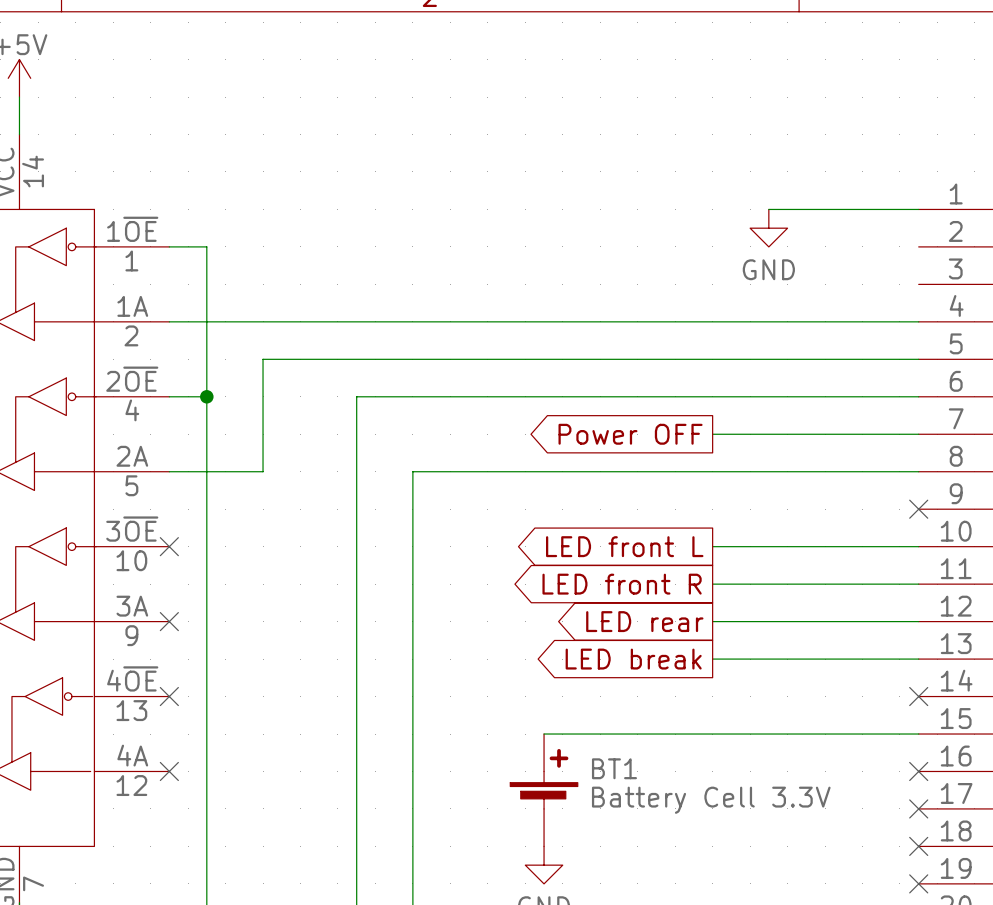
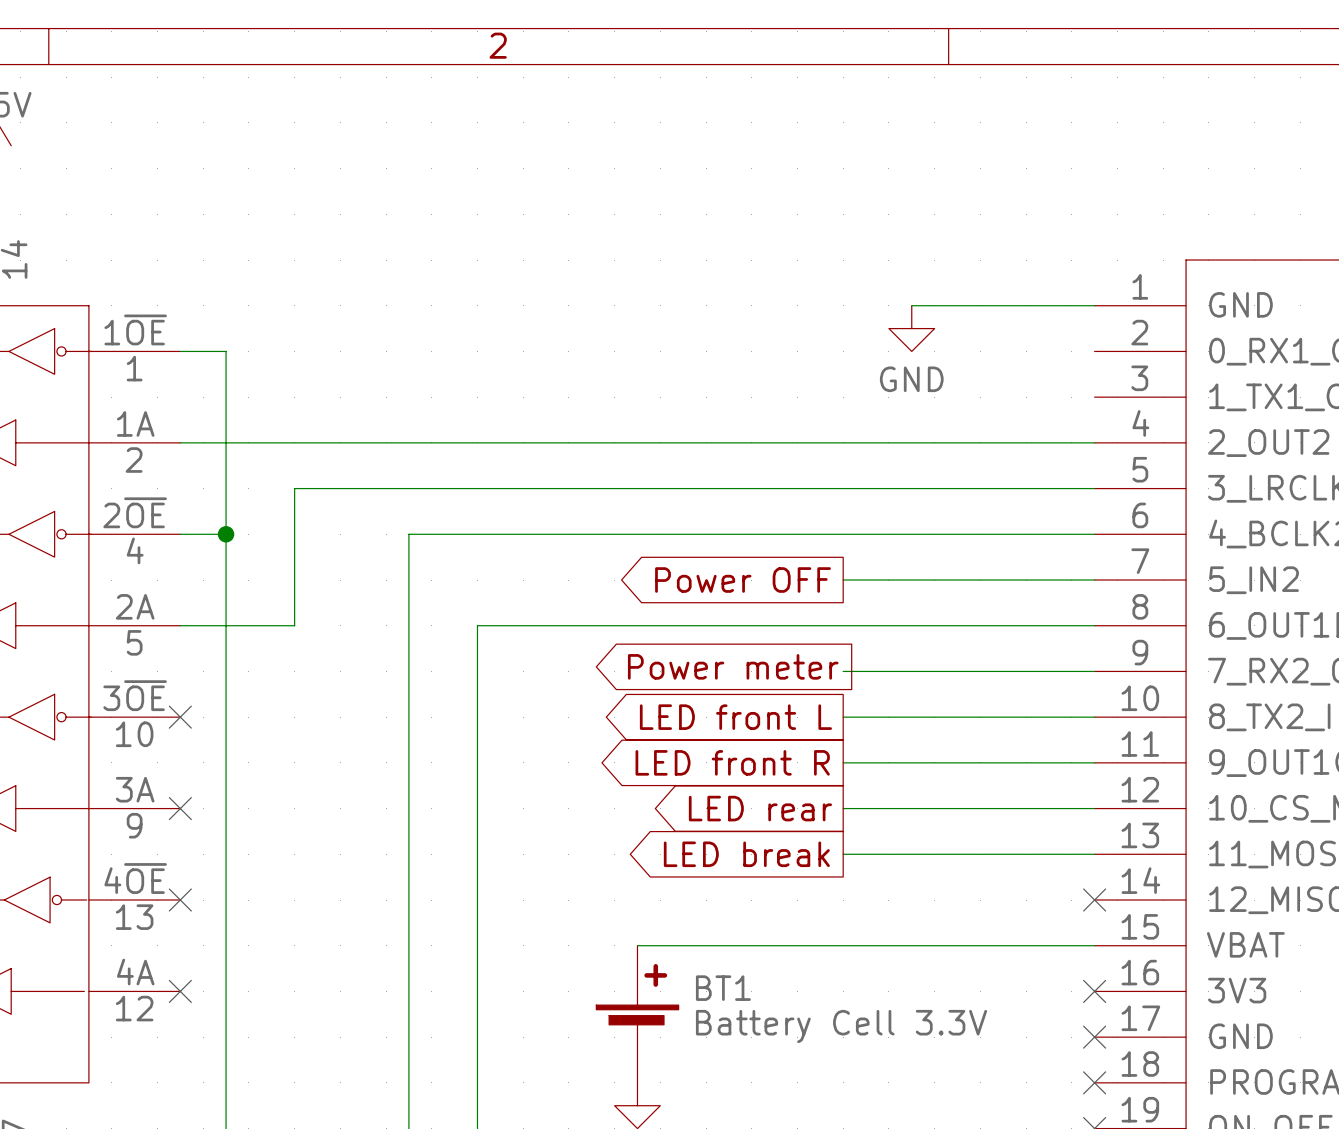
global label: none -> Power meter (733, 666)
wire: none -> (843, 671) (1094, 671)
no-connect mark: (918, 509) -> none

